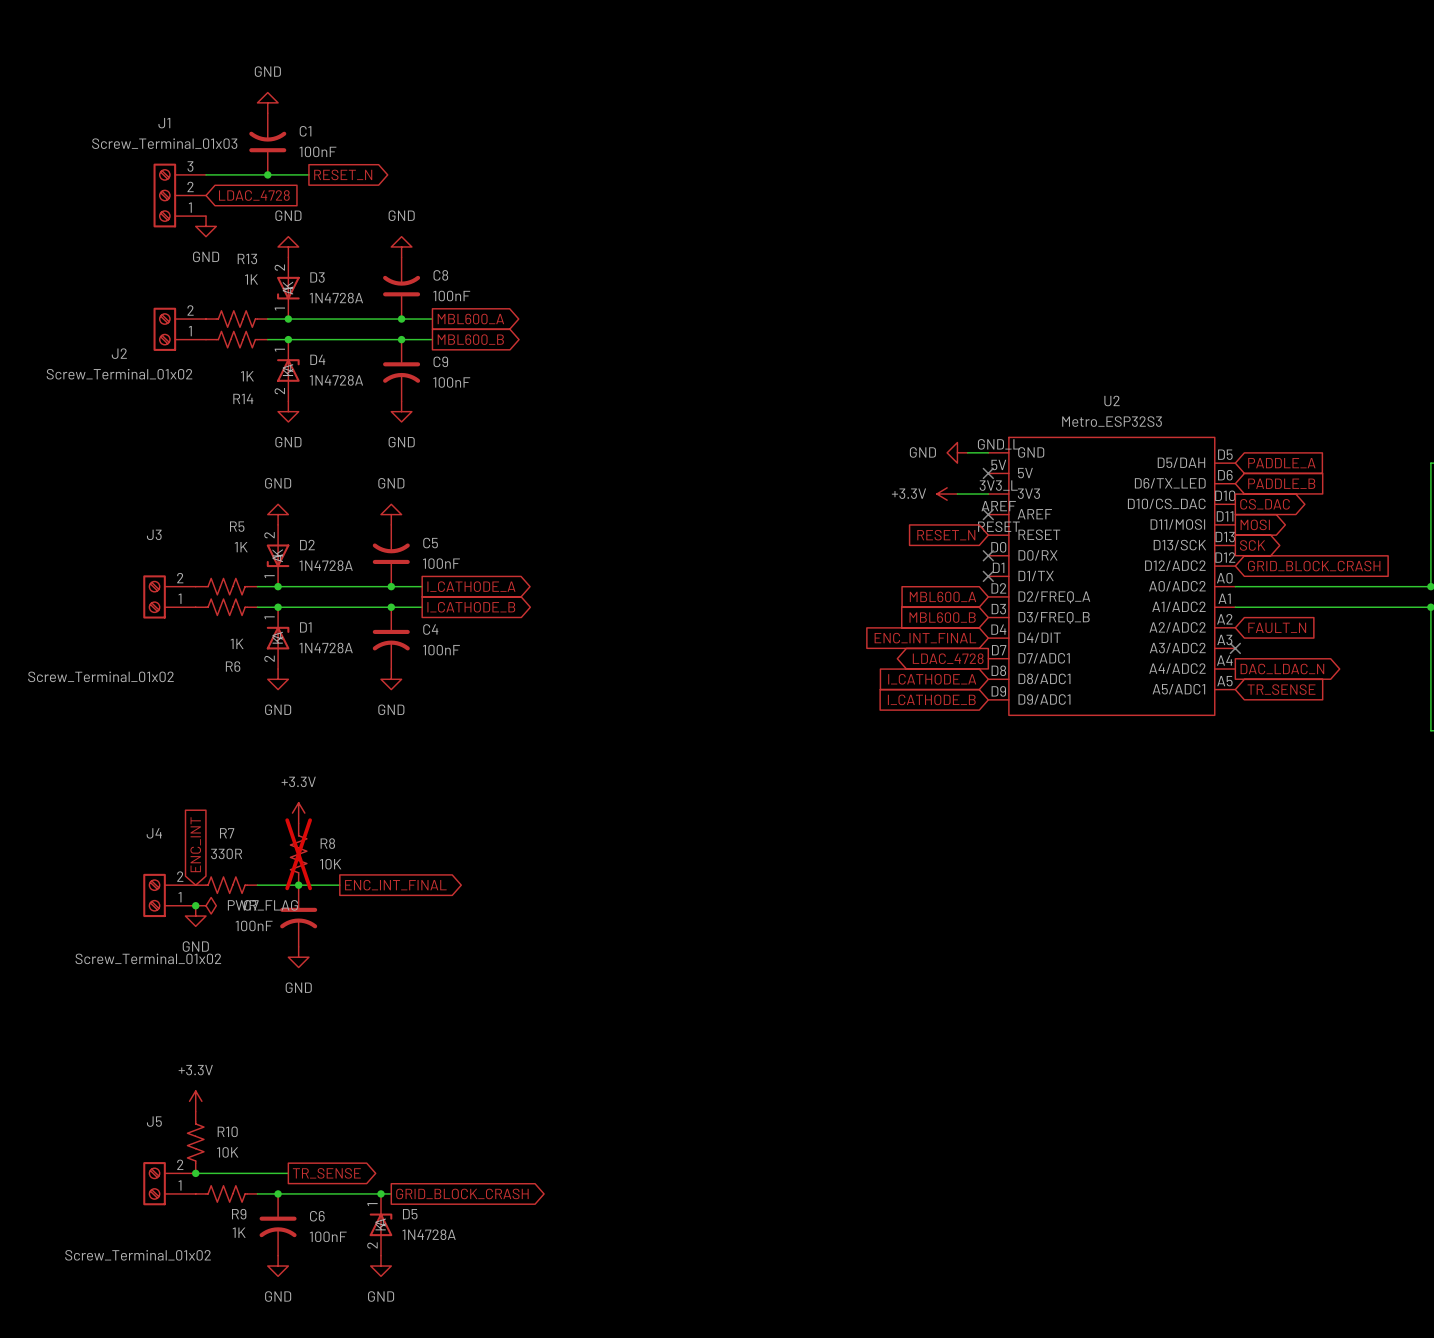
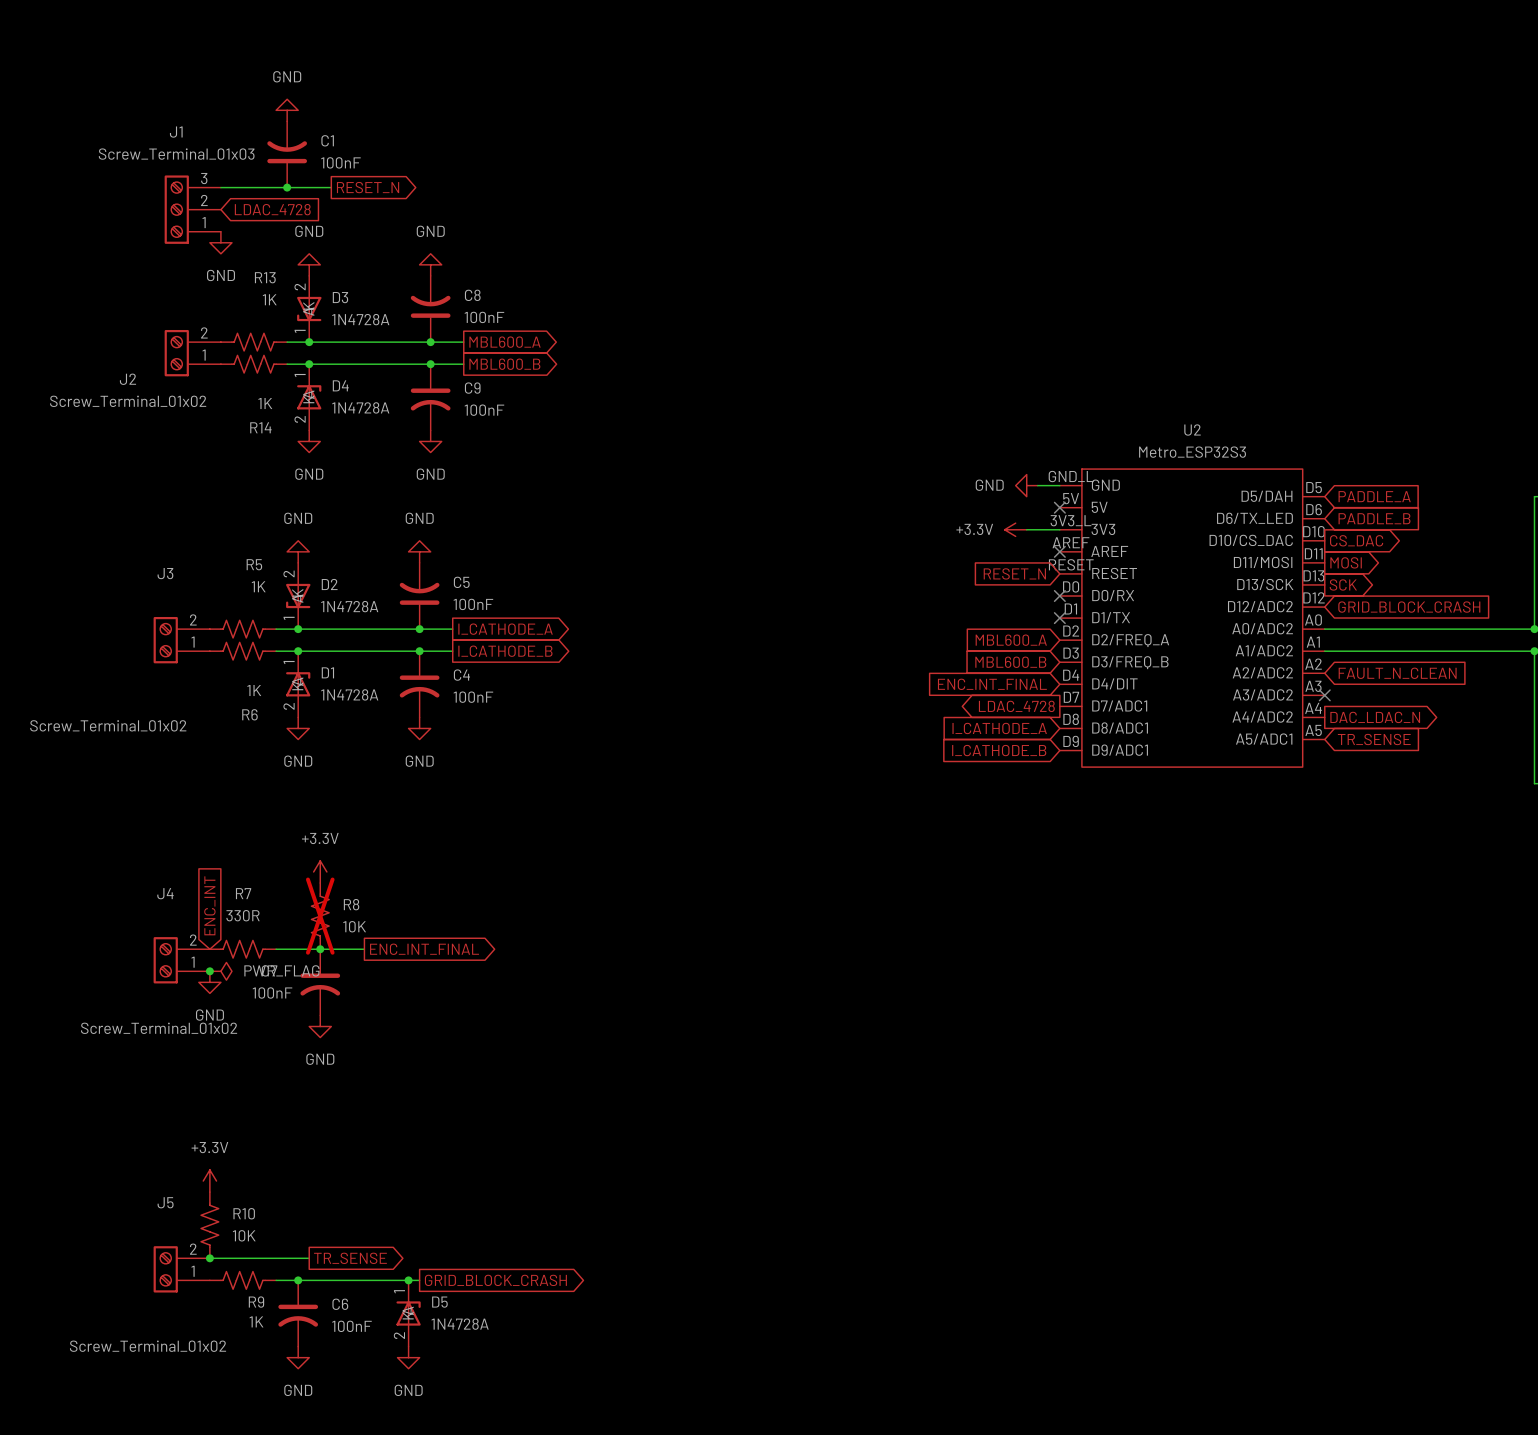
global label: FAULT_N (1277, 627) -> FAULT_N_CLEAN (1397, 673)

